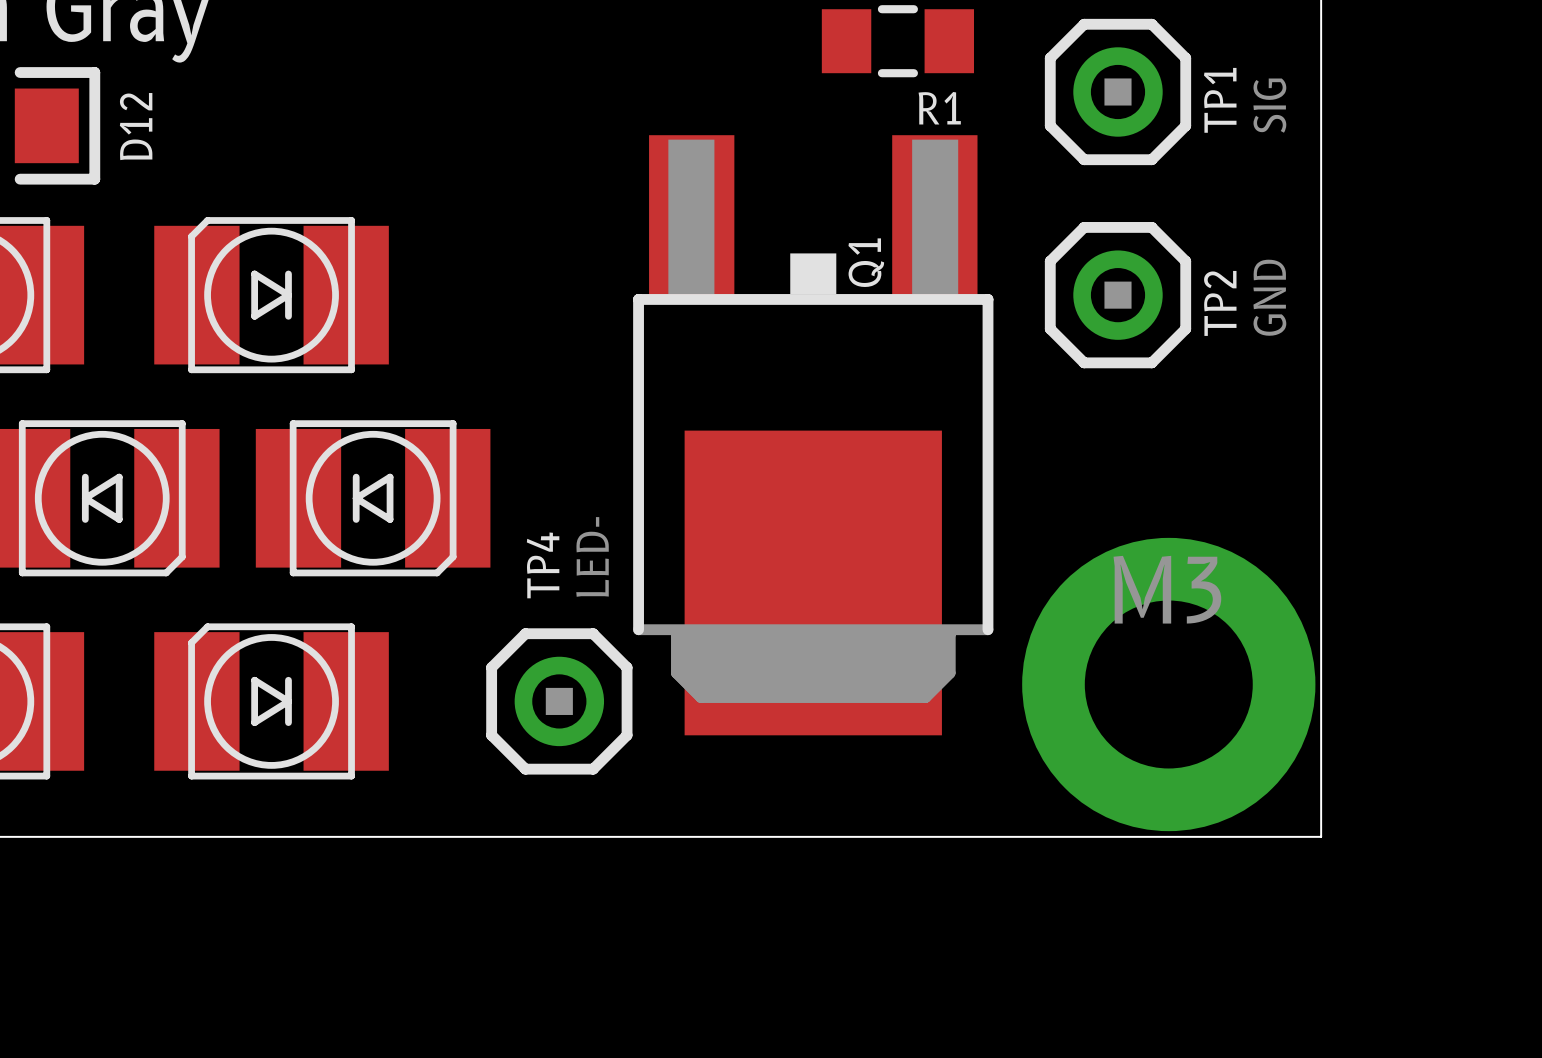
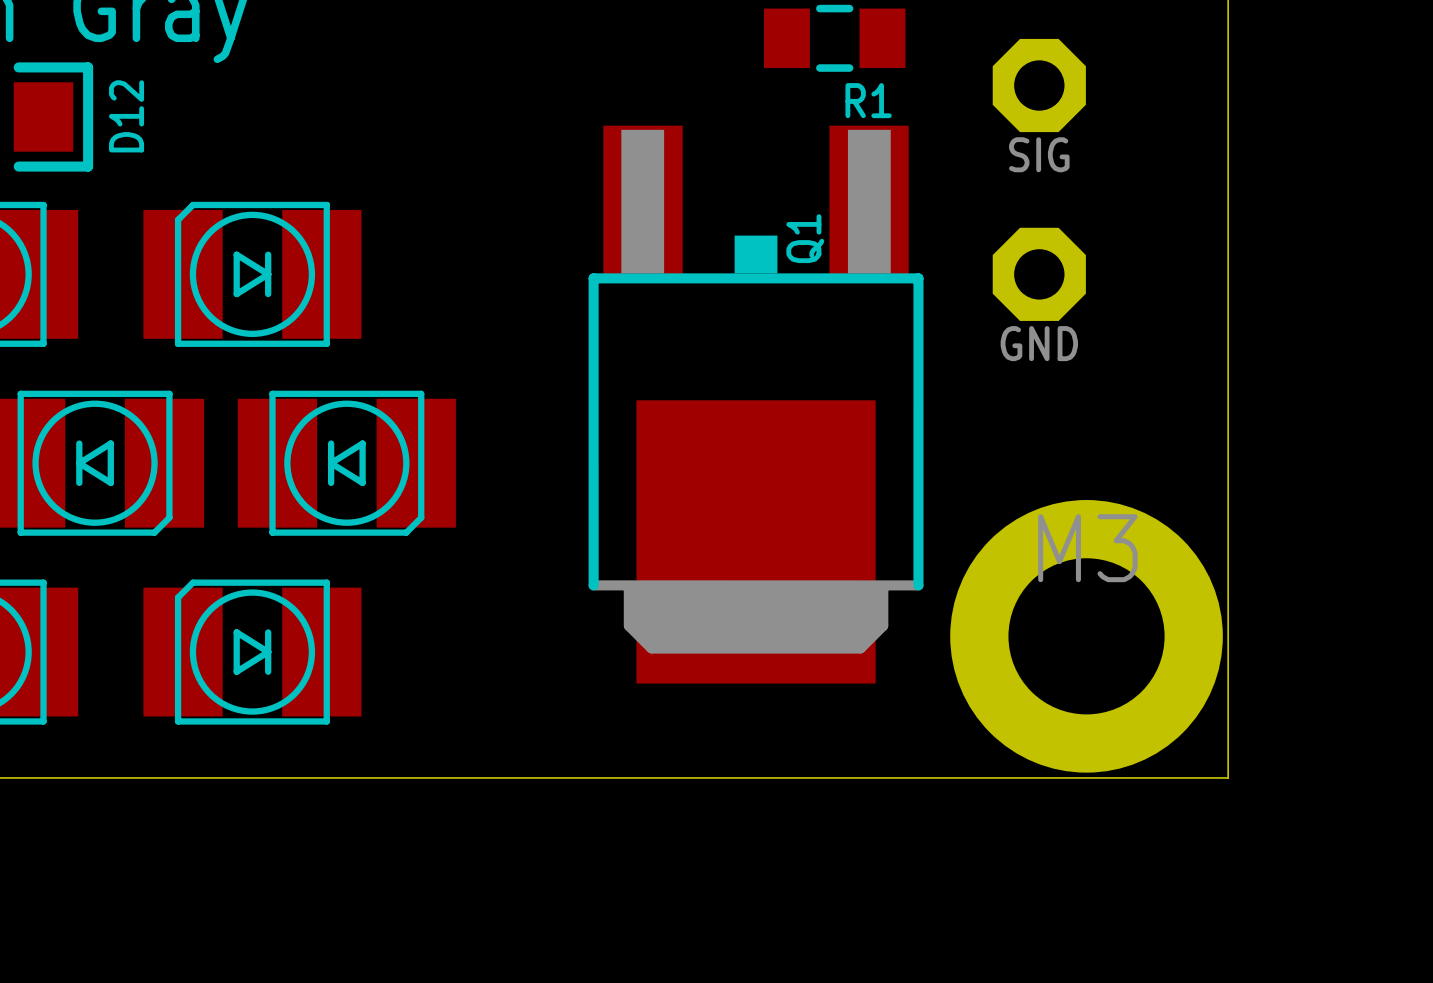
TP1: SIG (1118, 91) -> none
part: none -> SIG (1039, 85)
TP2: GND (1118, 295) -> none
part: none -> GND (1039, 274)
TP4: LED- (559, 701) -> none

